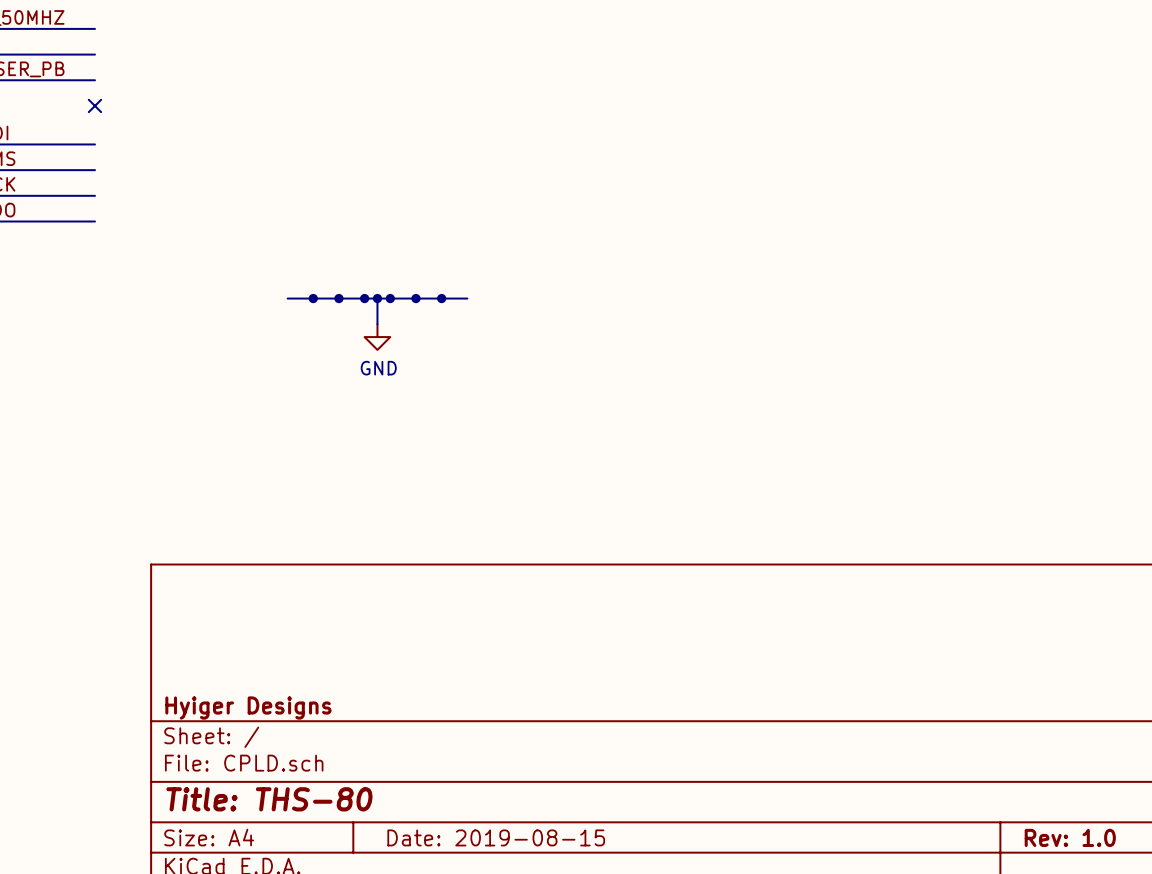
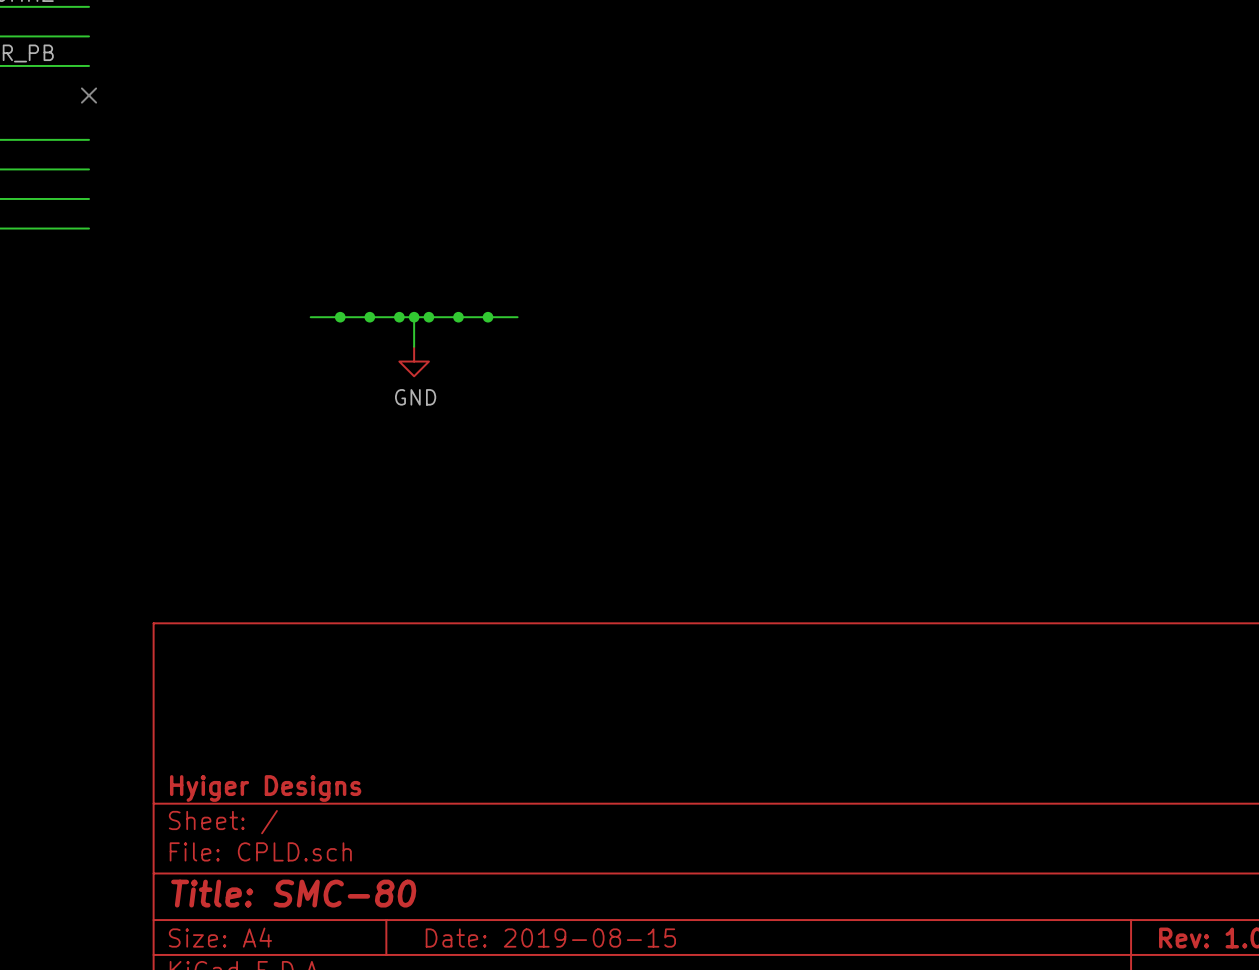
title block: Title: THS-80 (269, 799) -> Title: SMC-80 (293, 893)

